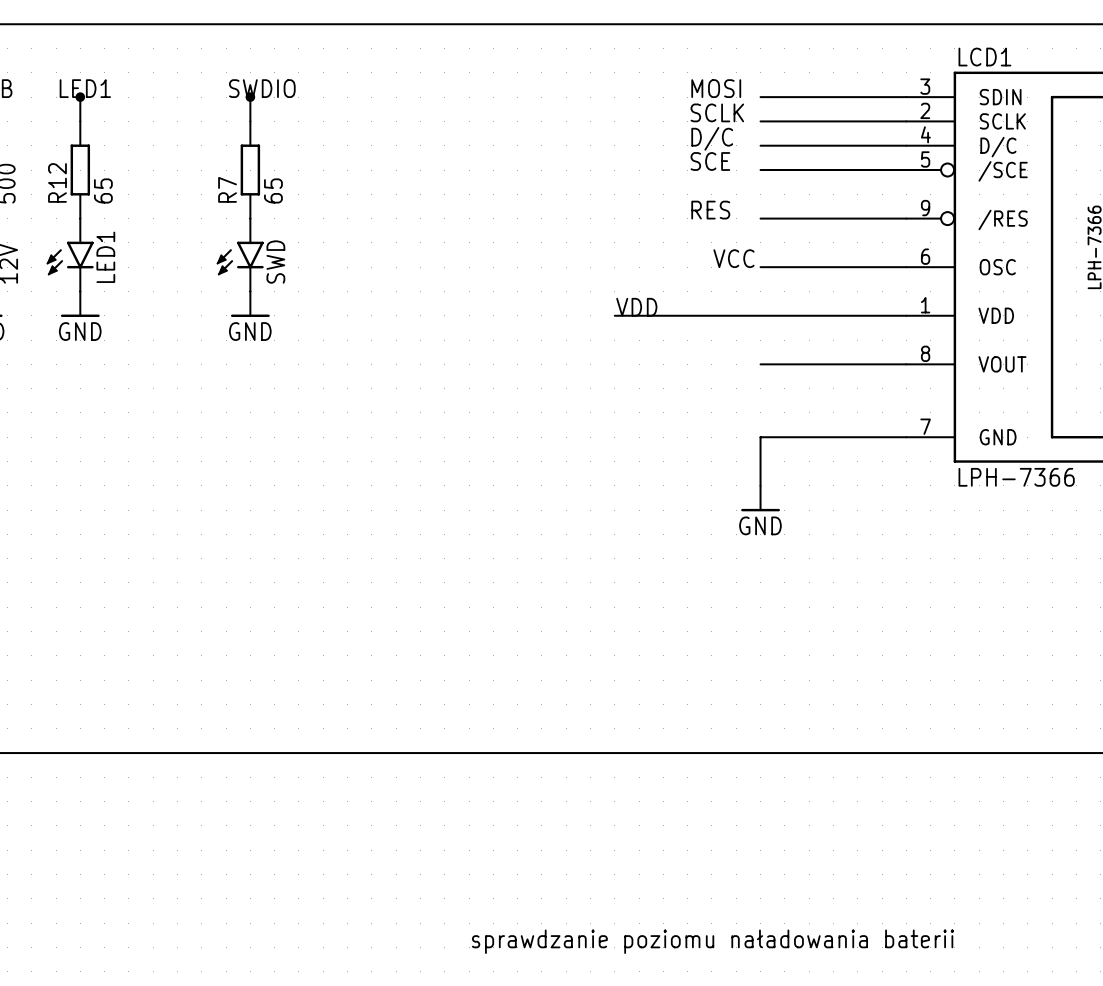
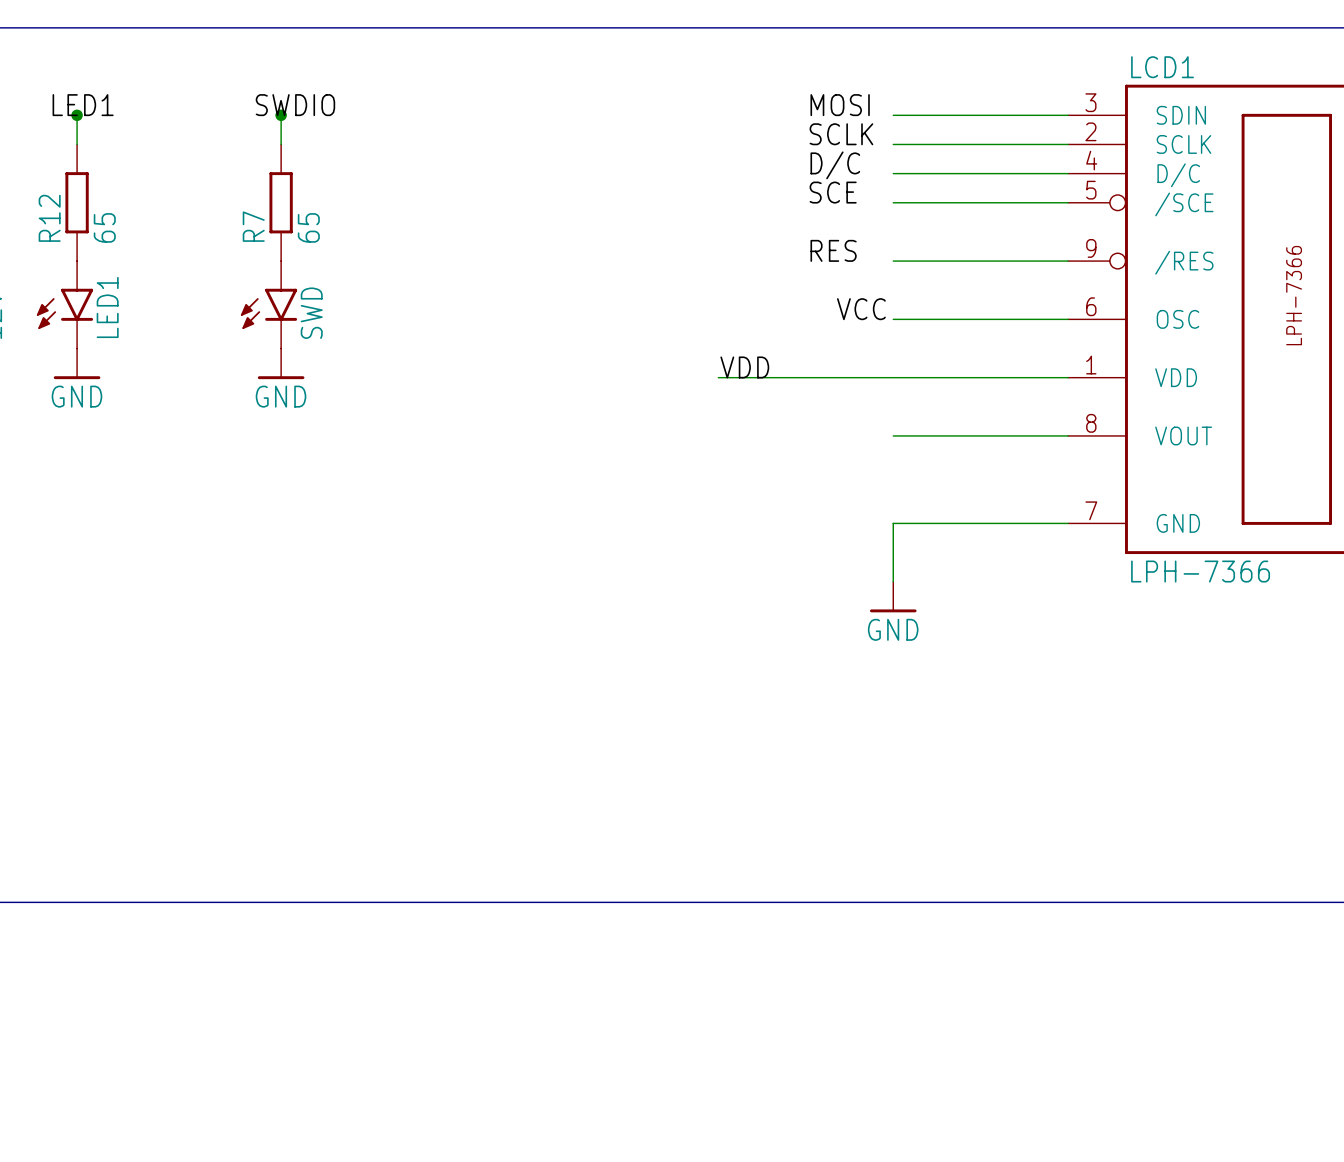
text: sprawdzanie poziomu naładowania baterii (712, 941) -> none

